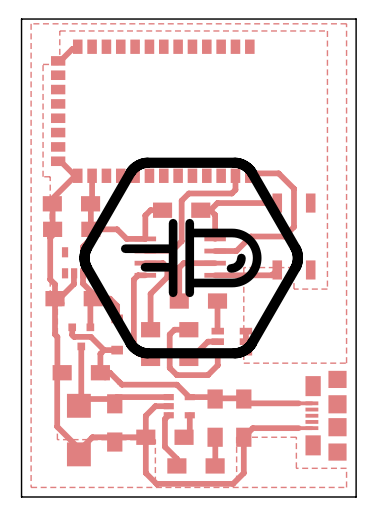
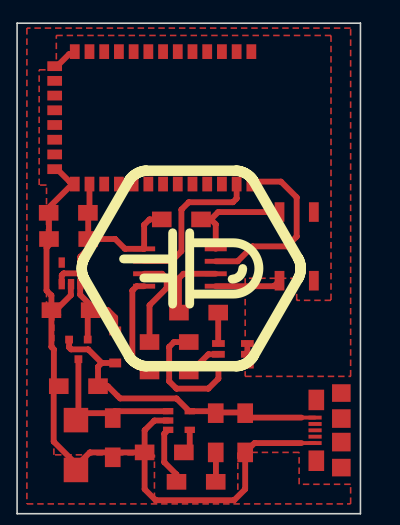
top track: none -> (80, 284) (80, 275) (78, 273) (63, 273) (61, 275) (61, 284)

